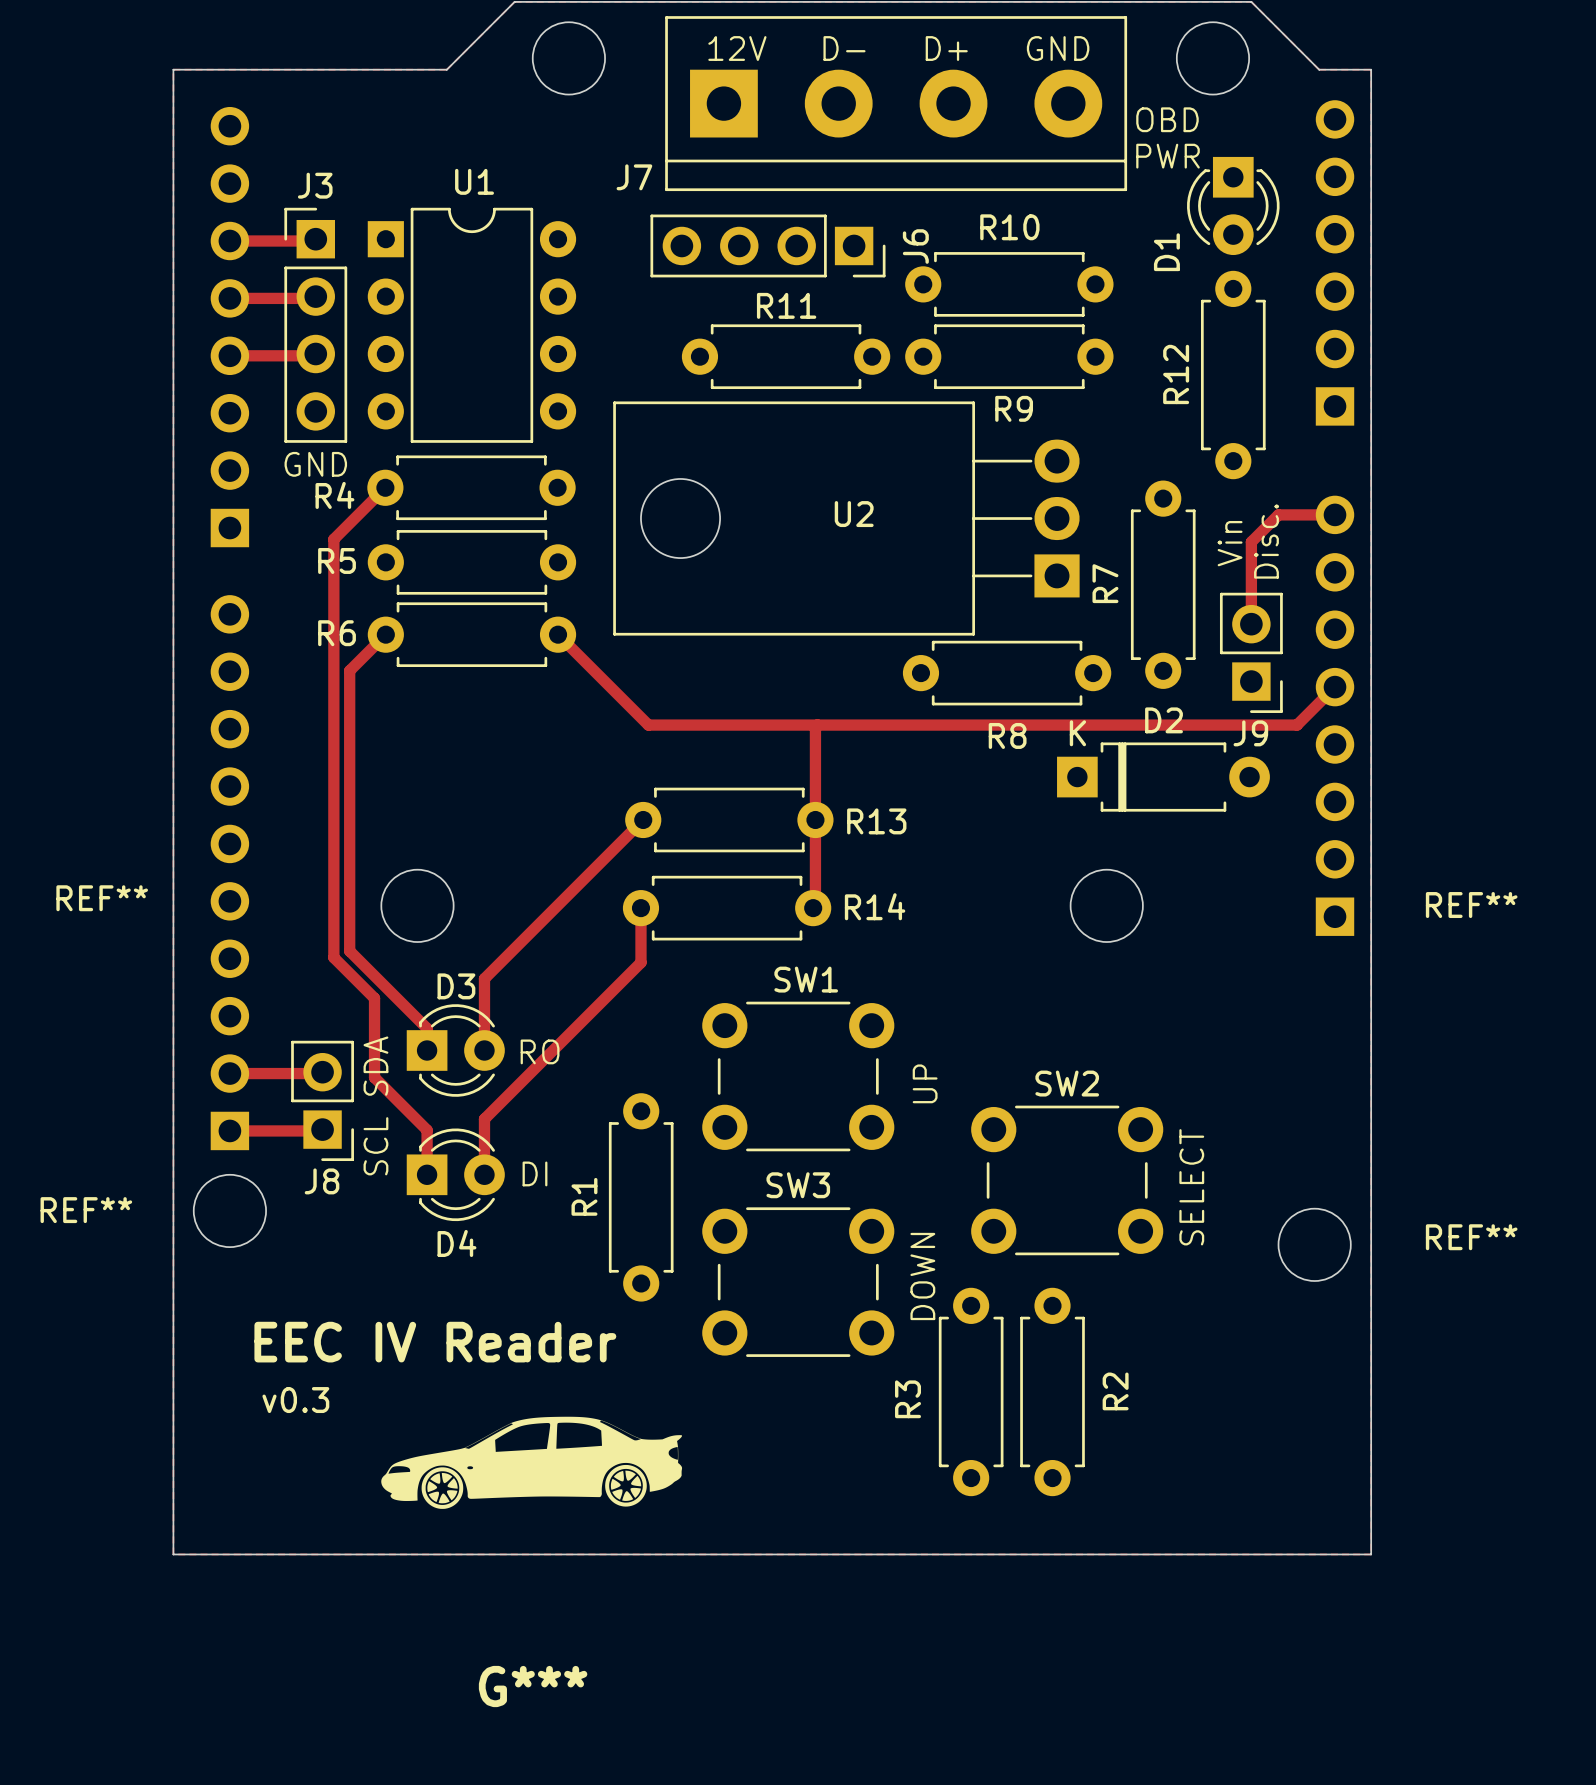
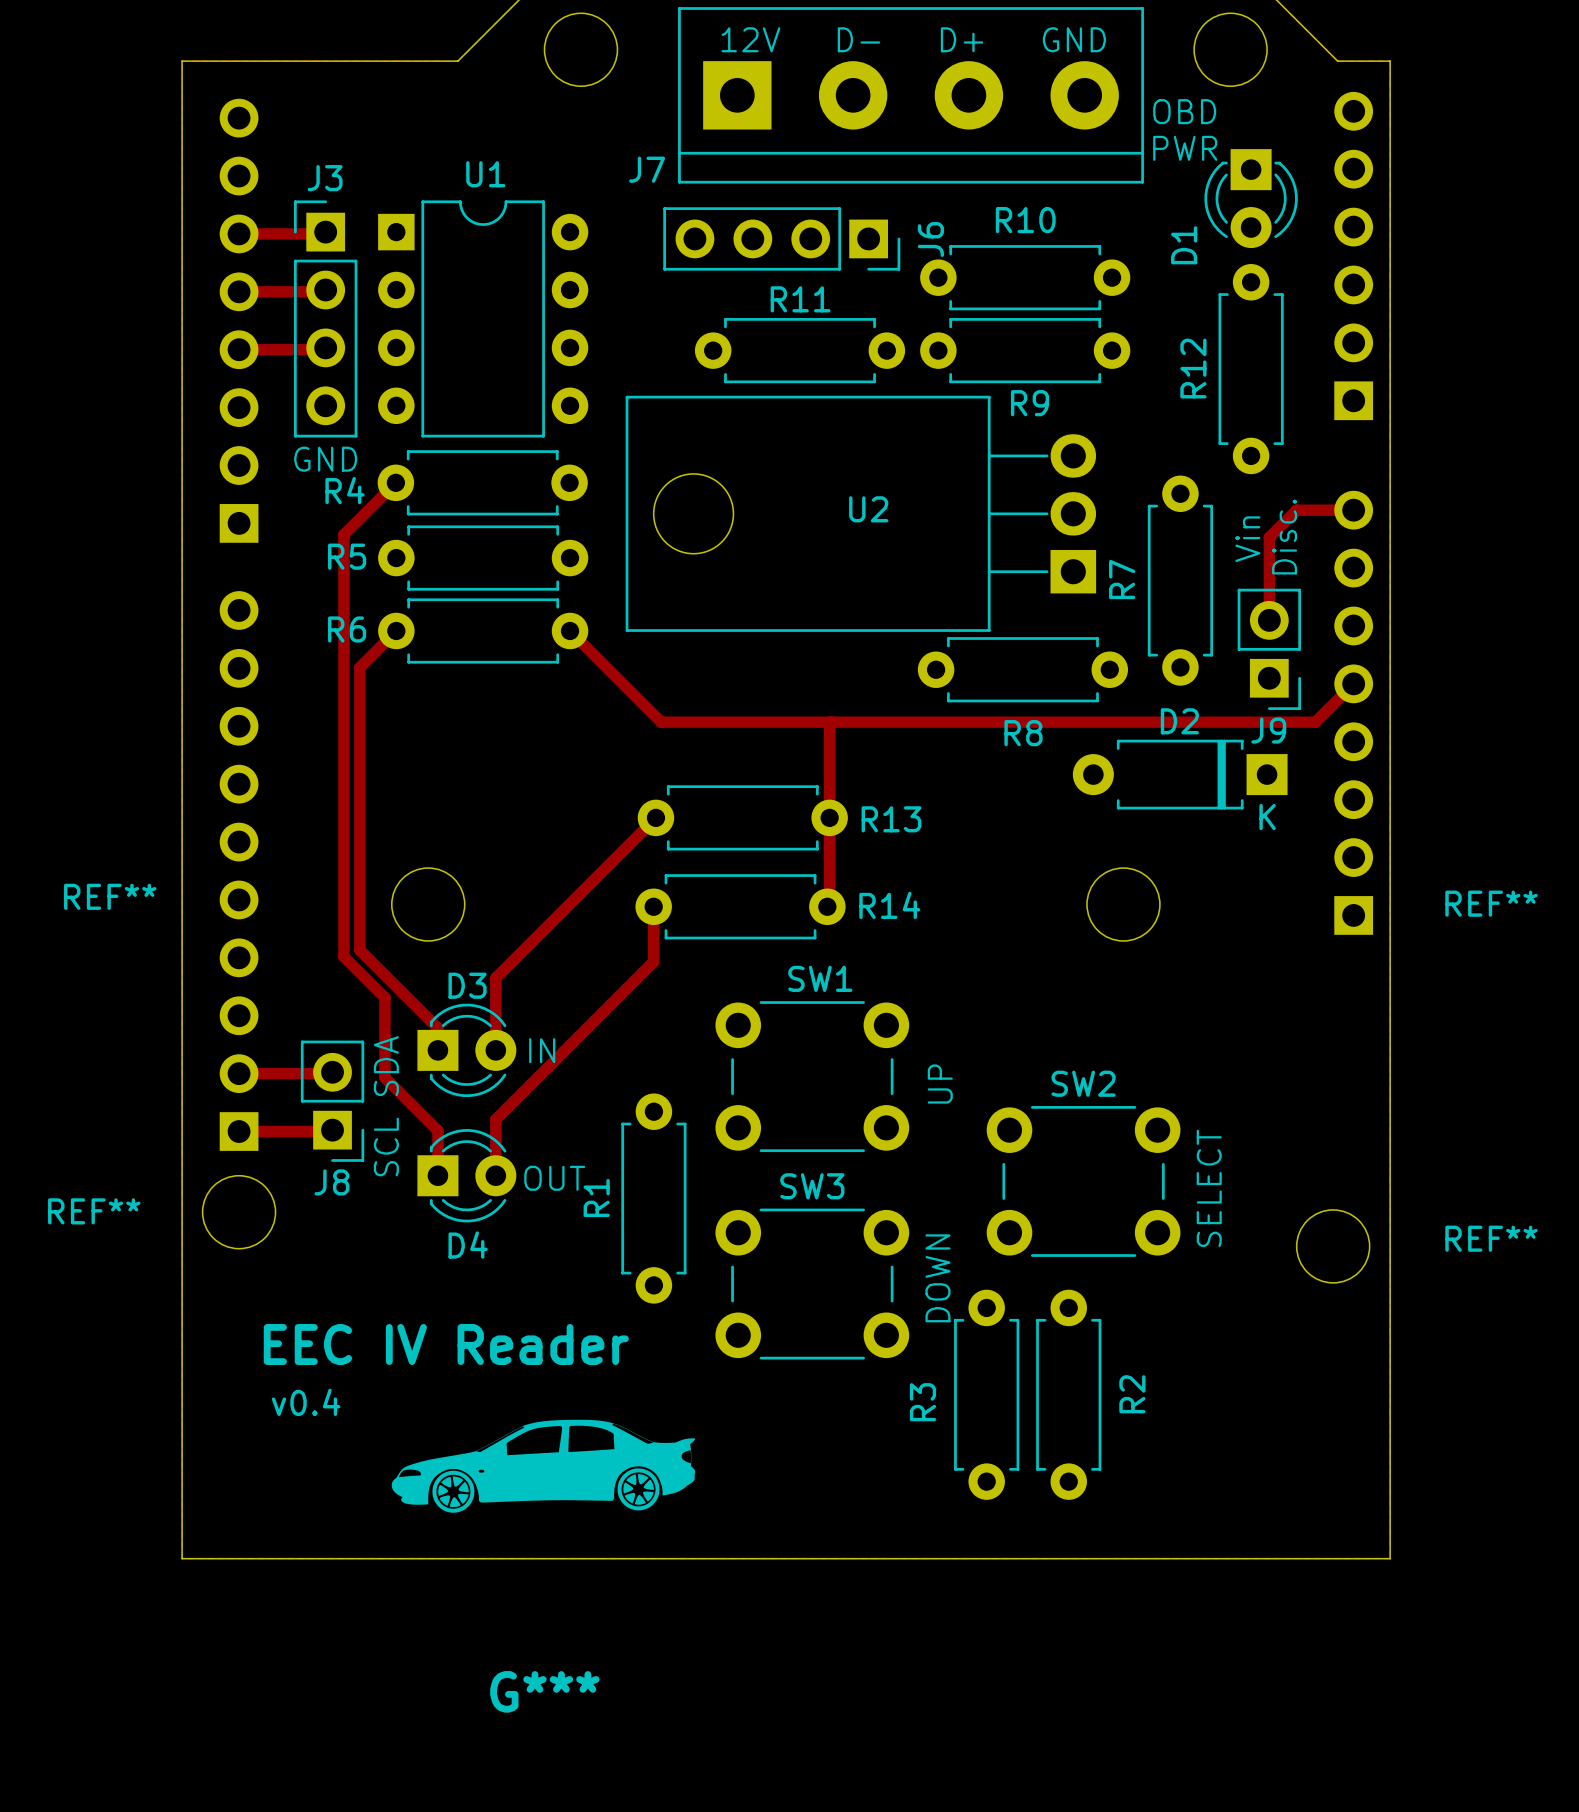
D2 rotation: 0° (1163, 777) -> 180° (1180, 774)
text: RO (540, 1051) -> IN (542, 1050)
text: DI (534, 1173) -> OUT (554, 1178)
text: v0.3 (295, 1400) -> v0.4 (306, 1402)

